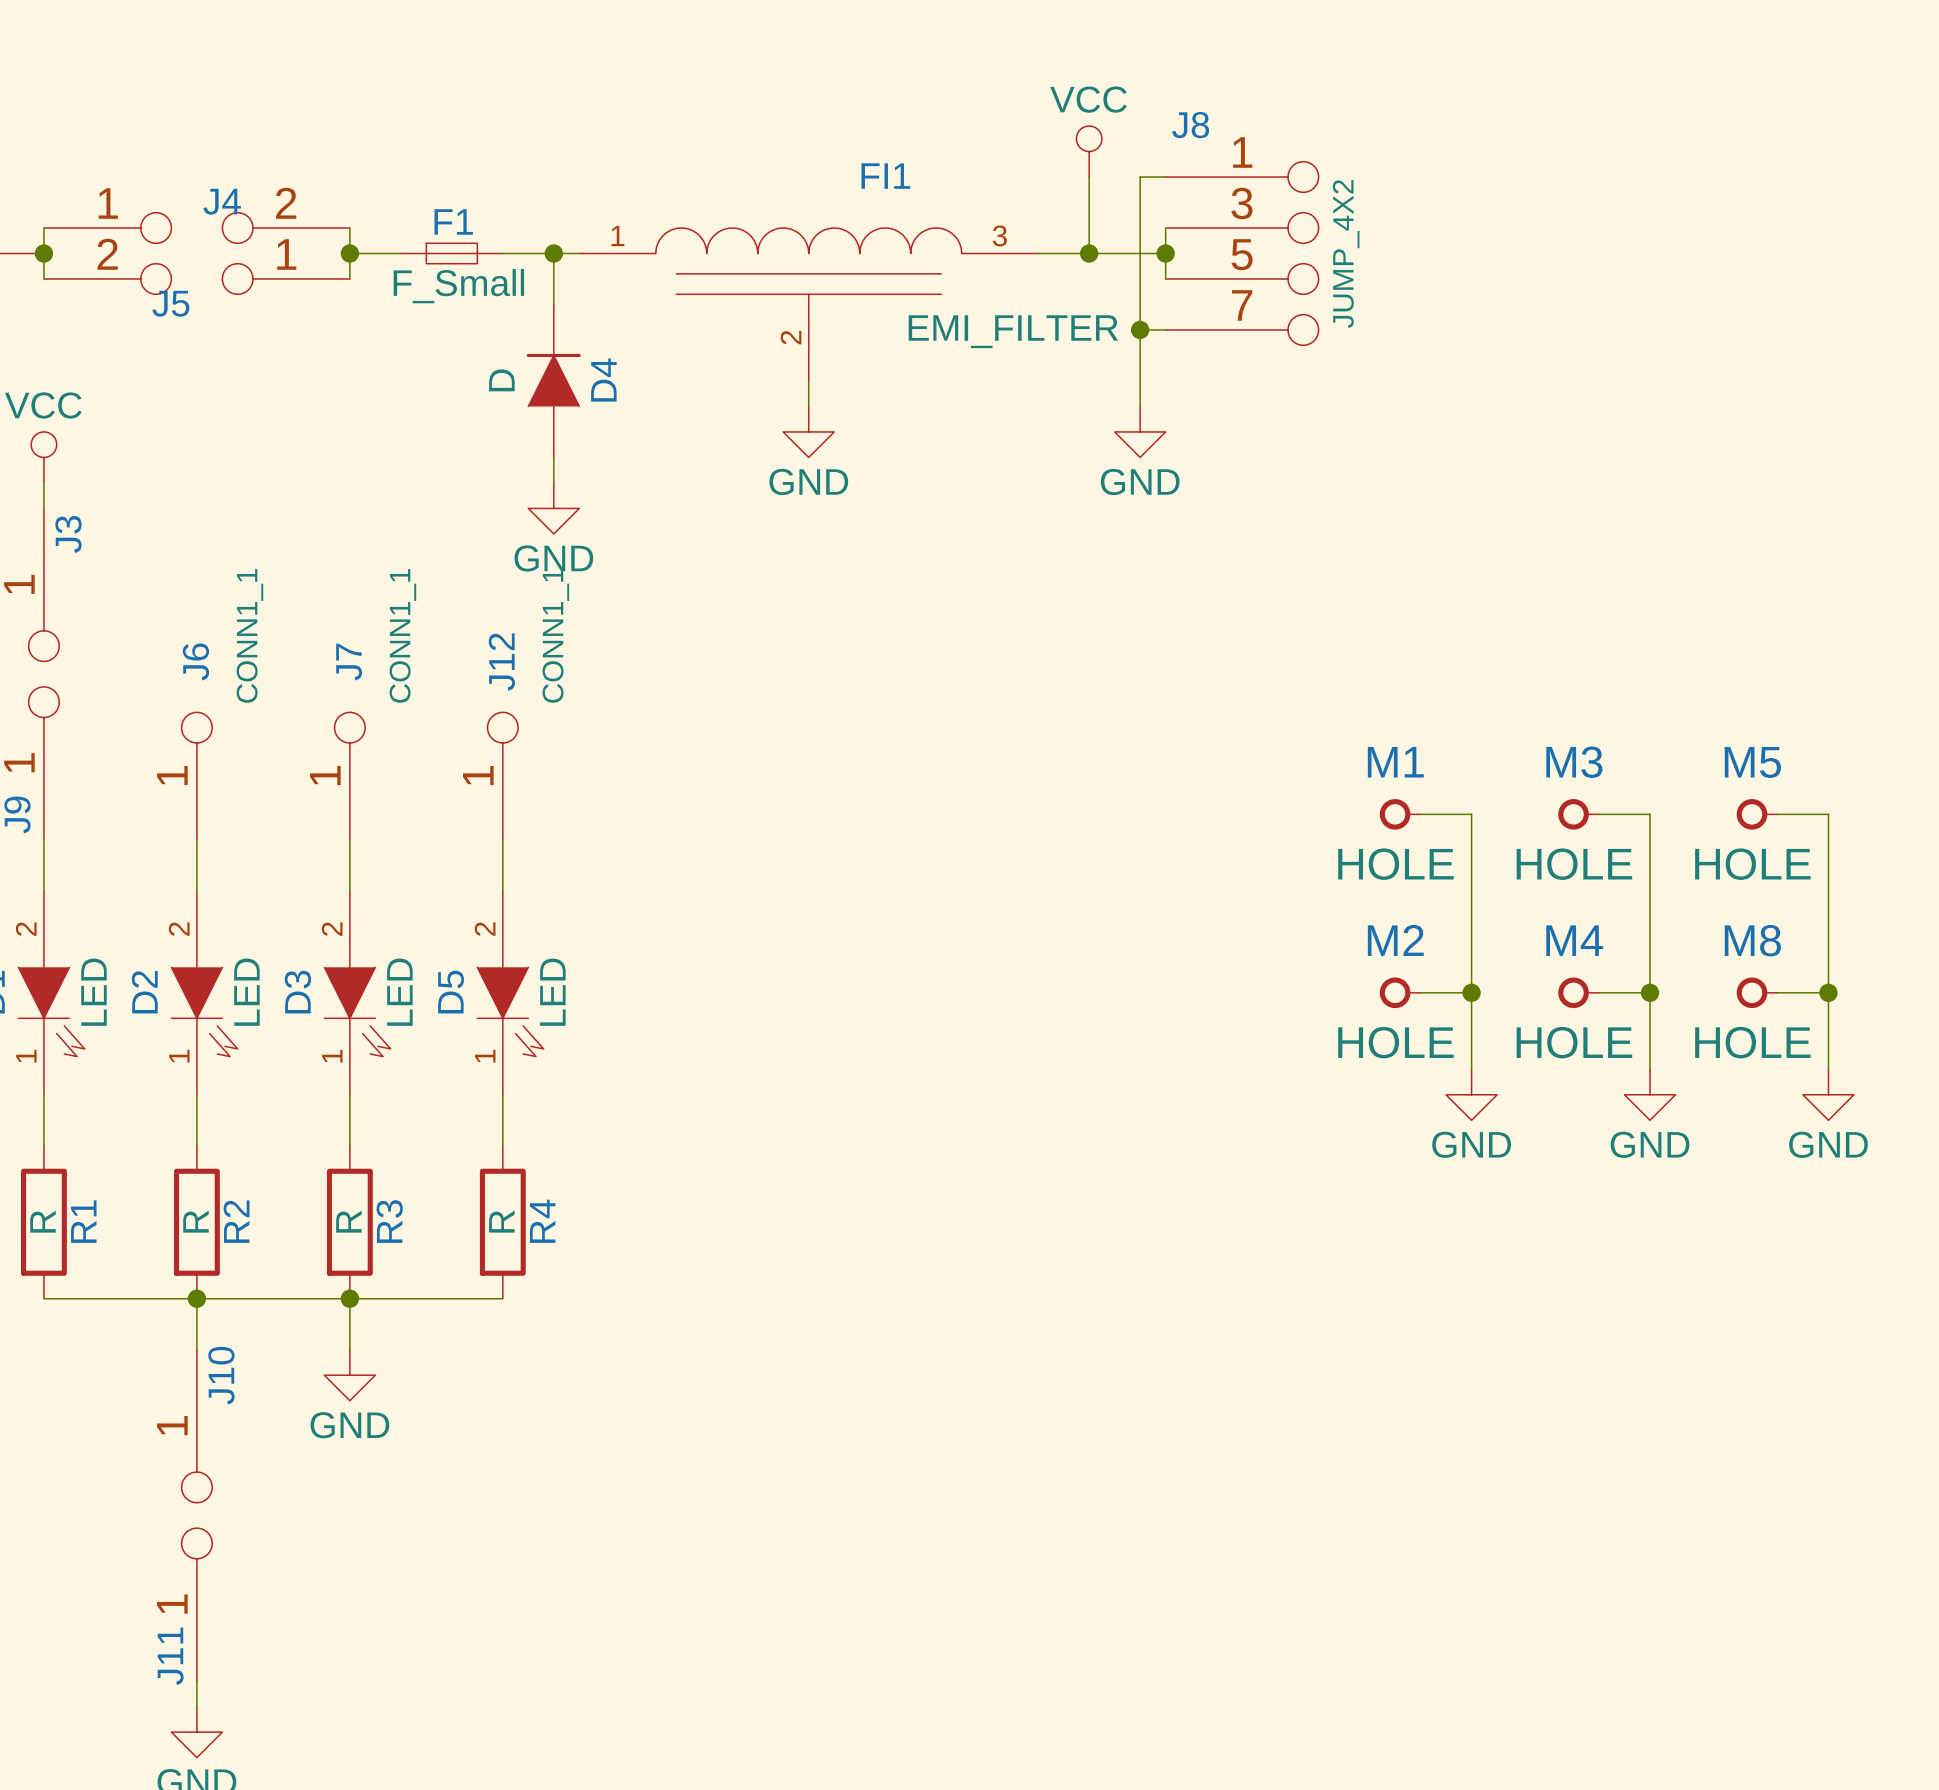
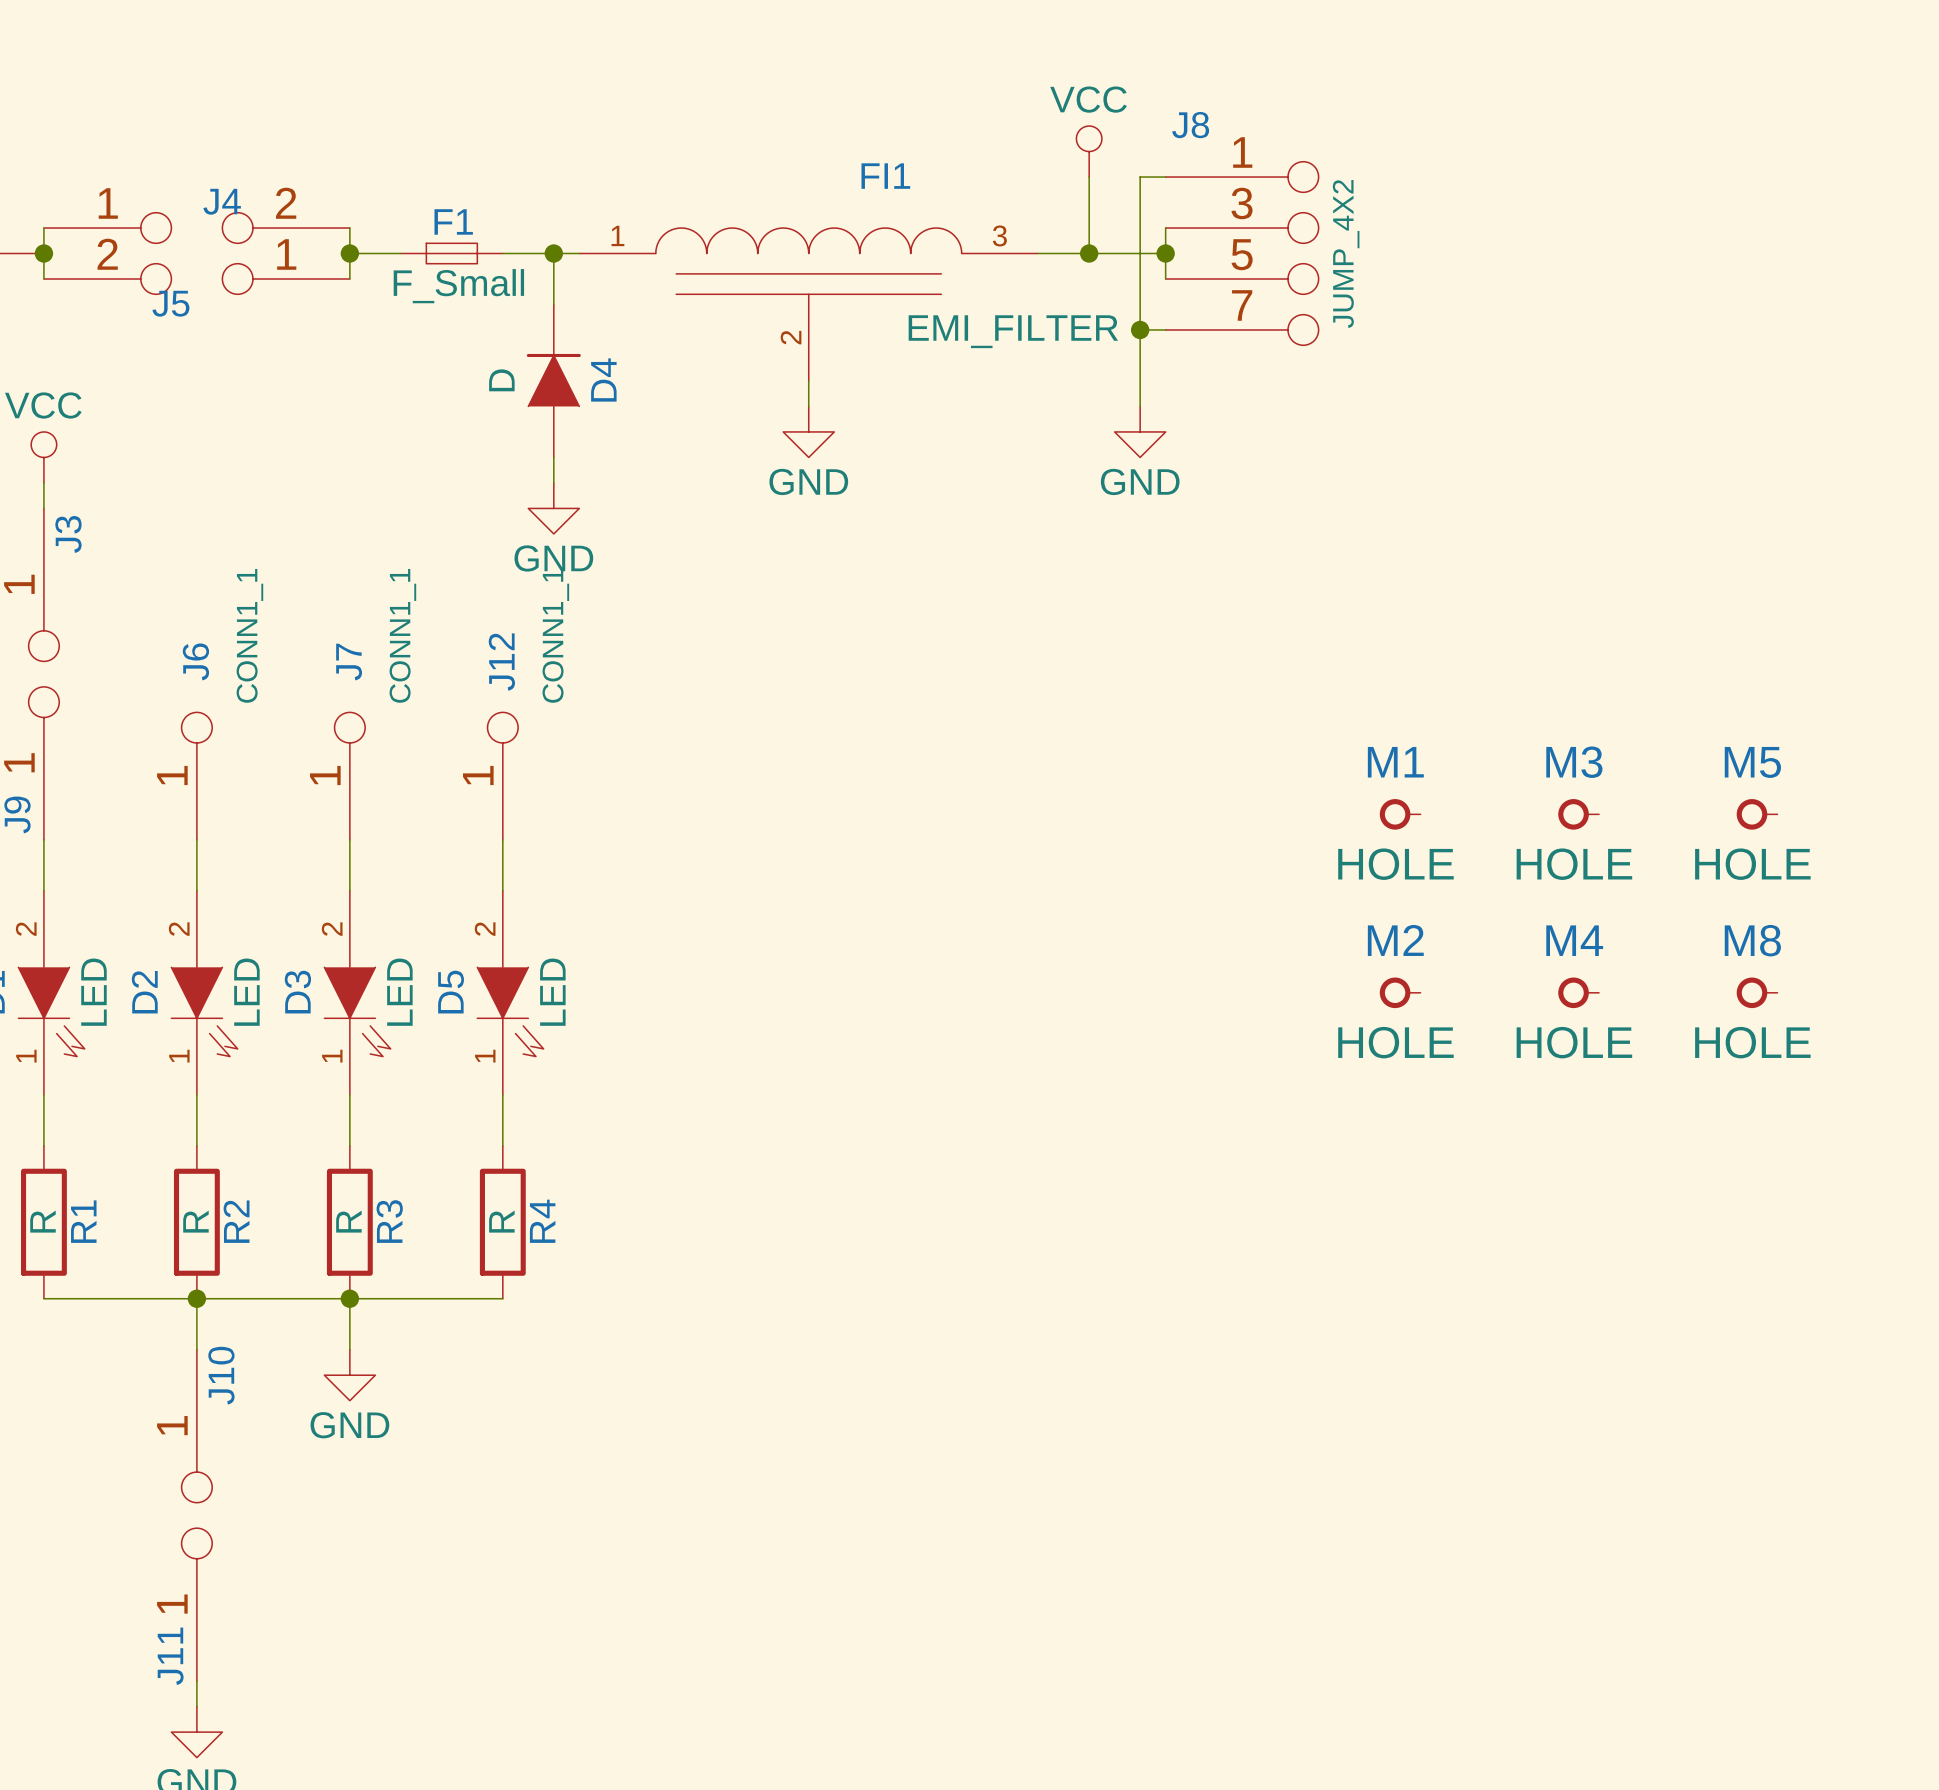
wire: (1420, 814) (1471, 814) (1471, 1069) -> none
wire: (1599, 814) (1650, 814) (1650, 1069) -> none
wire: (1777, 814) (1828, 814) (1828, 1069) -> none
wire: (1420, 992) (1471, 992) -> none
junction: (1471, 992) -> none
wire: (1599, 992) (1650, 992) -> none
junction: (1650, 992) -> none
wire: (1777, 992) (1828, 992) -> none
junction: (1828, 992) -> none
power symbol: GND (1471, 1094) -> none
power symbol: GND (1650, 1094) -> none
power symbol: GND (1828, 1094) -> none

